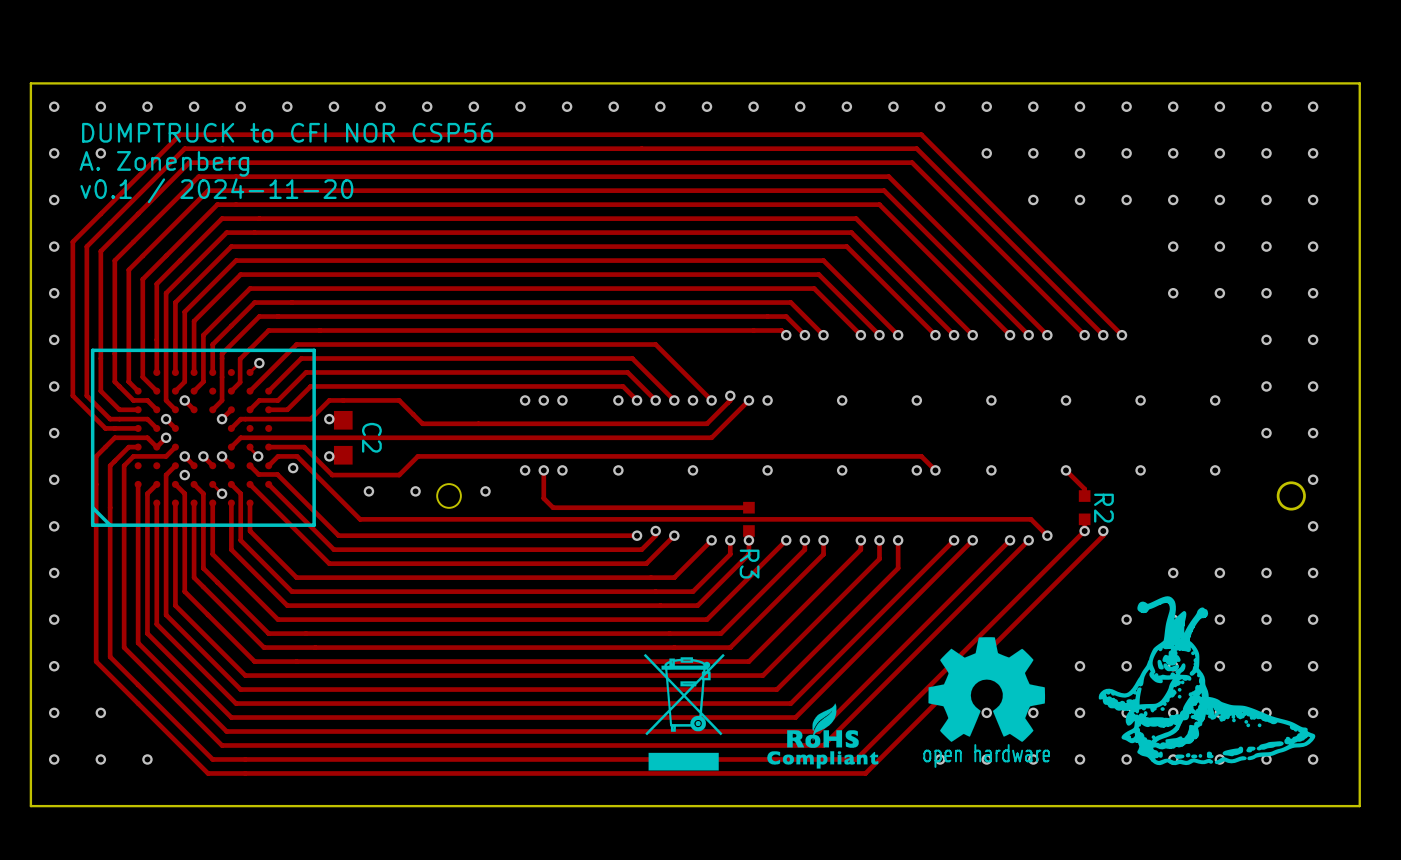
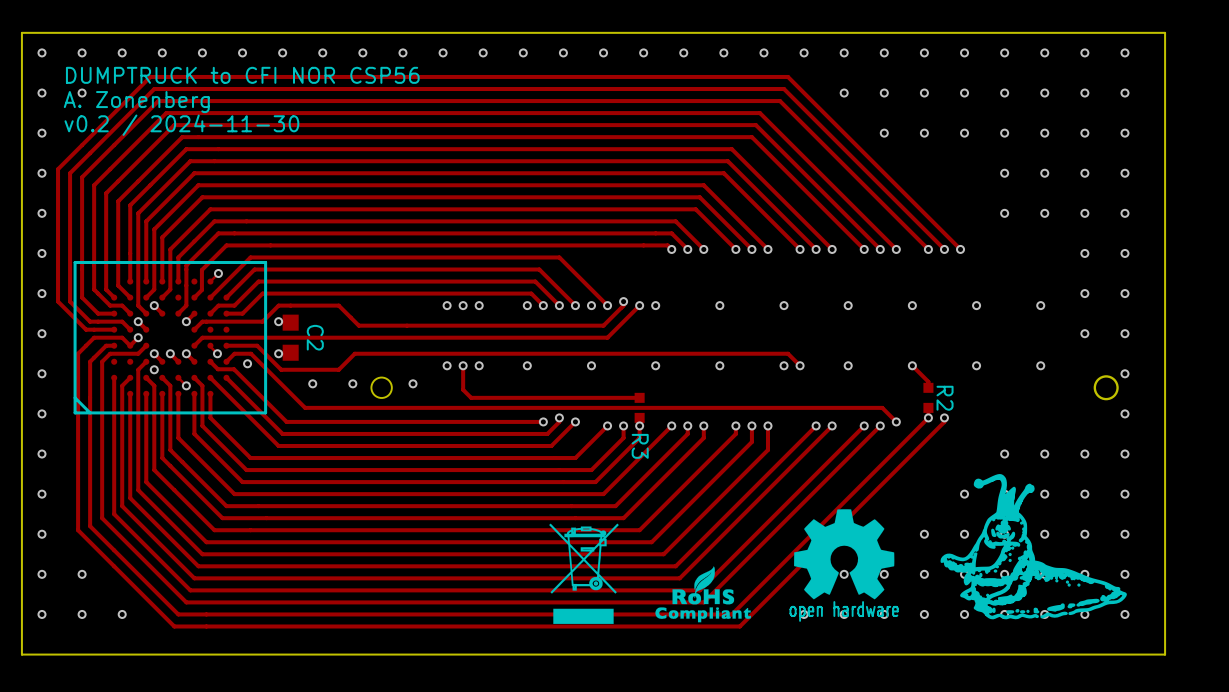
text: v0.1 / 2024-11-20 (216, 190) -> v0.2 / 2024-11-30 (181, 125)

